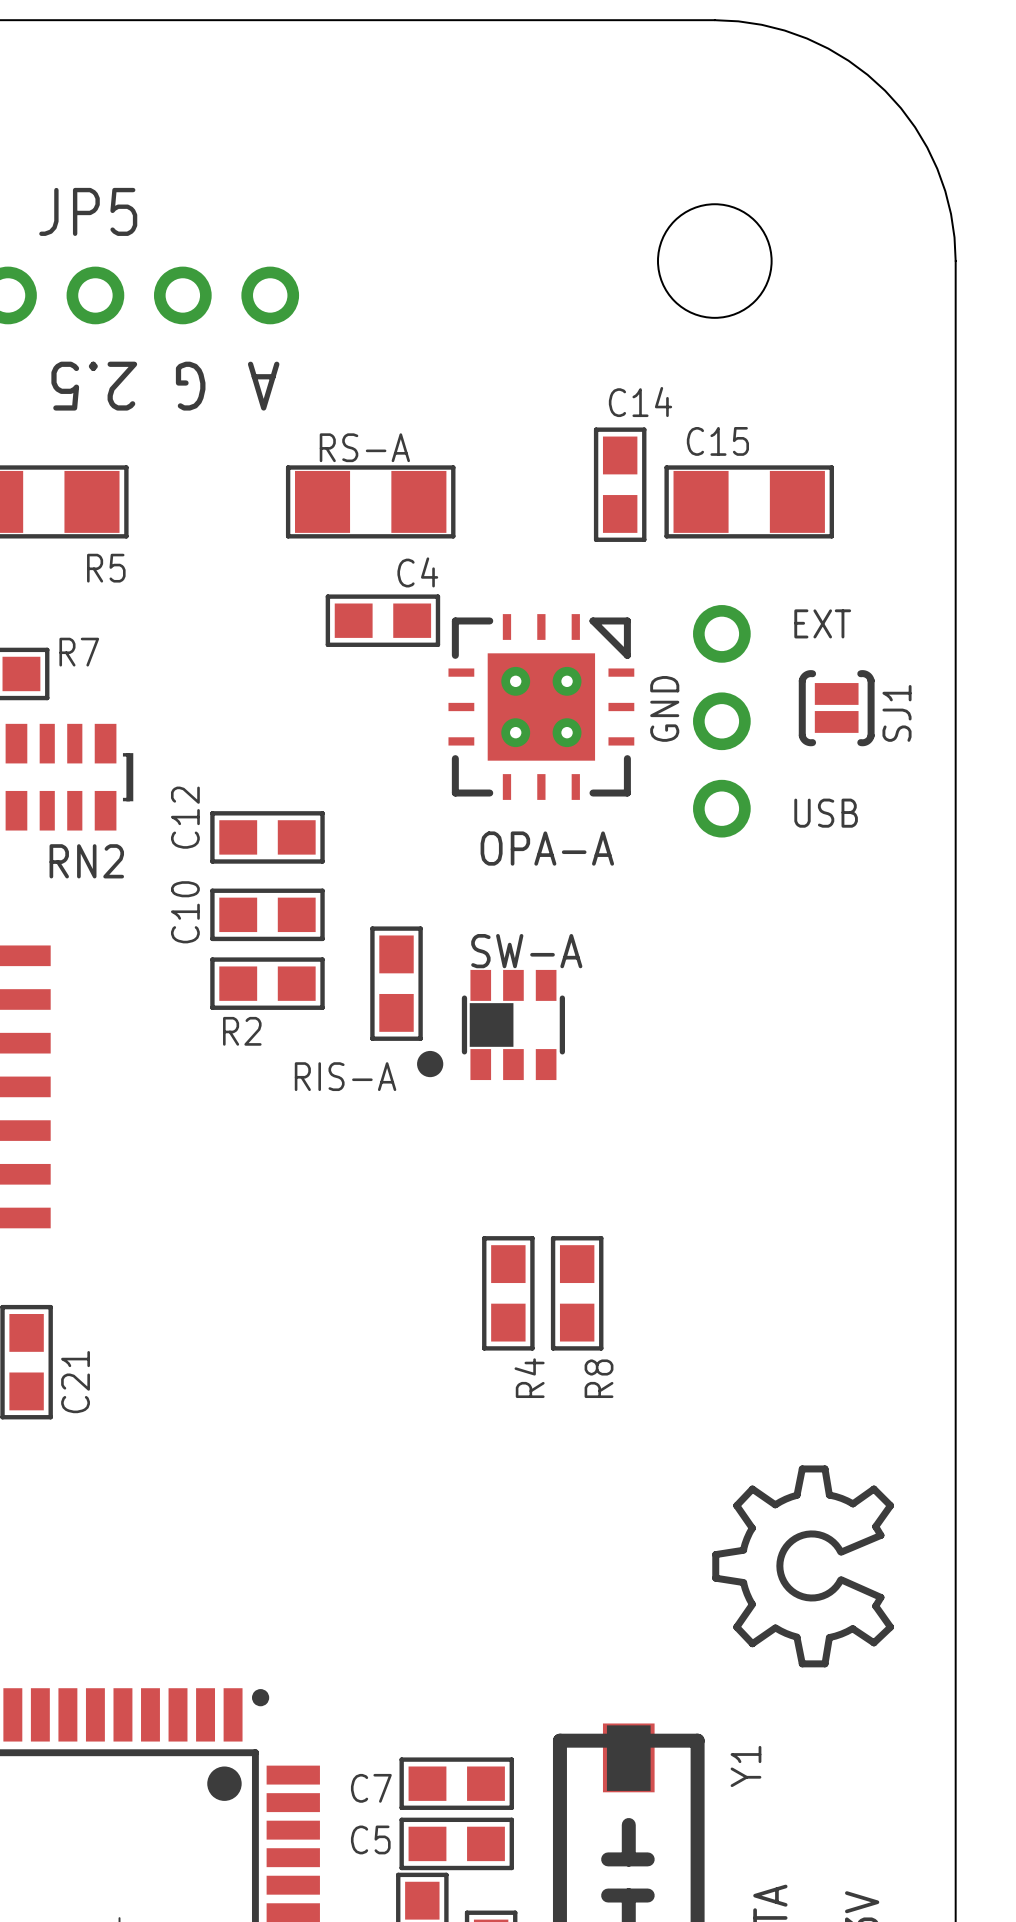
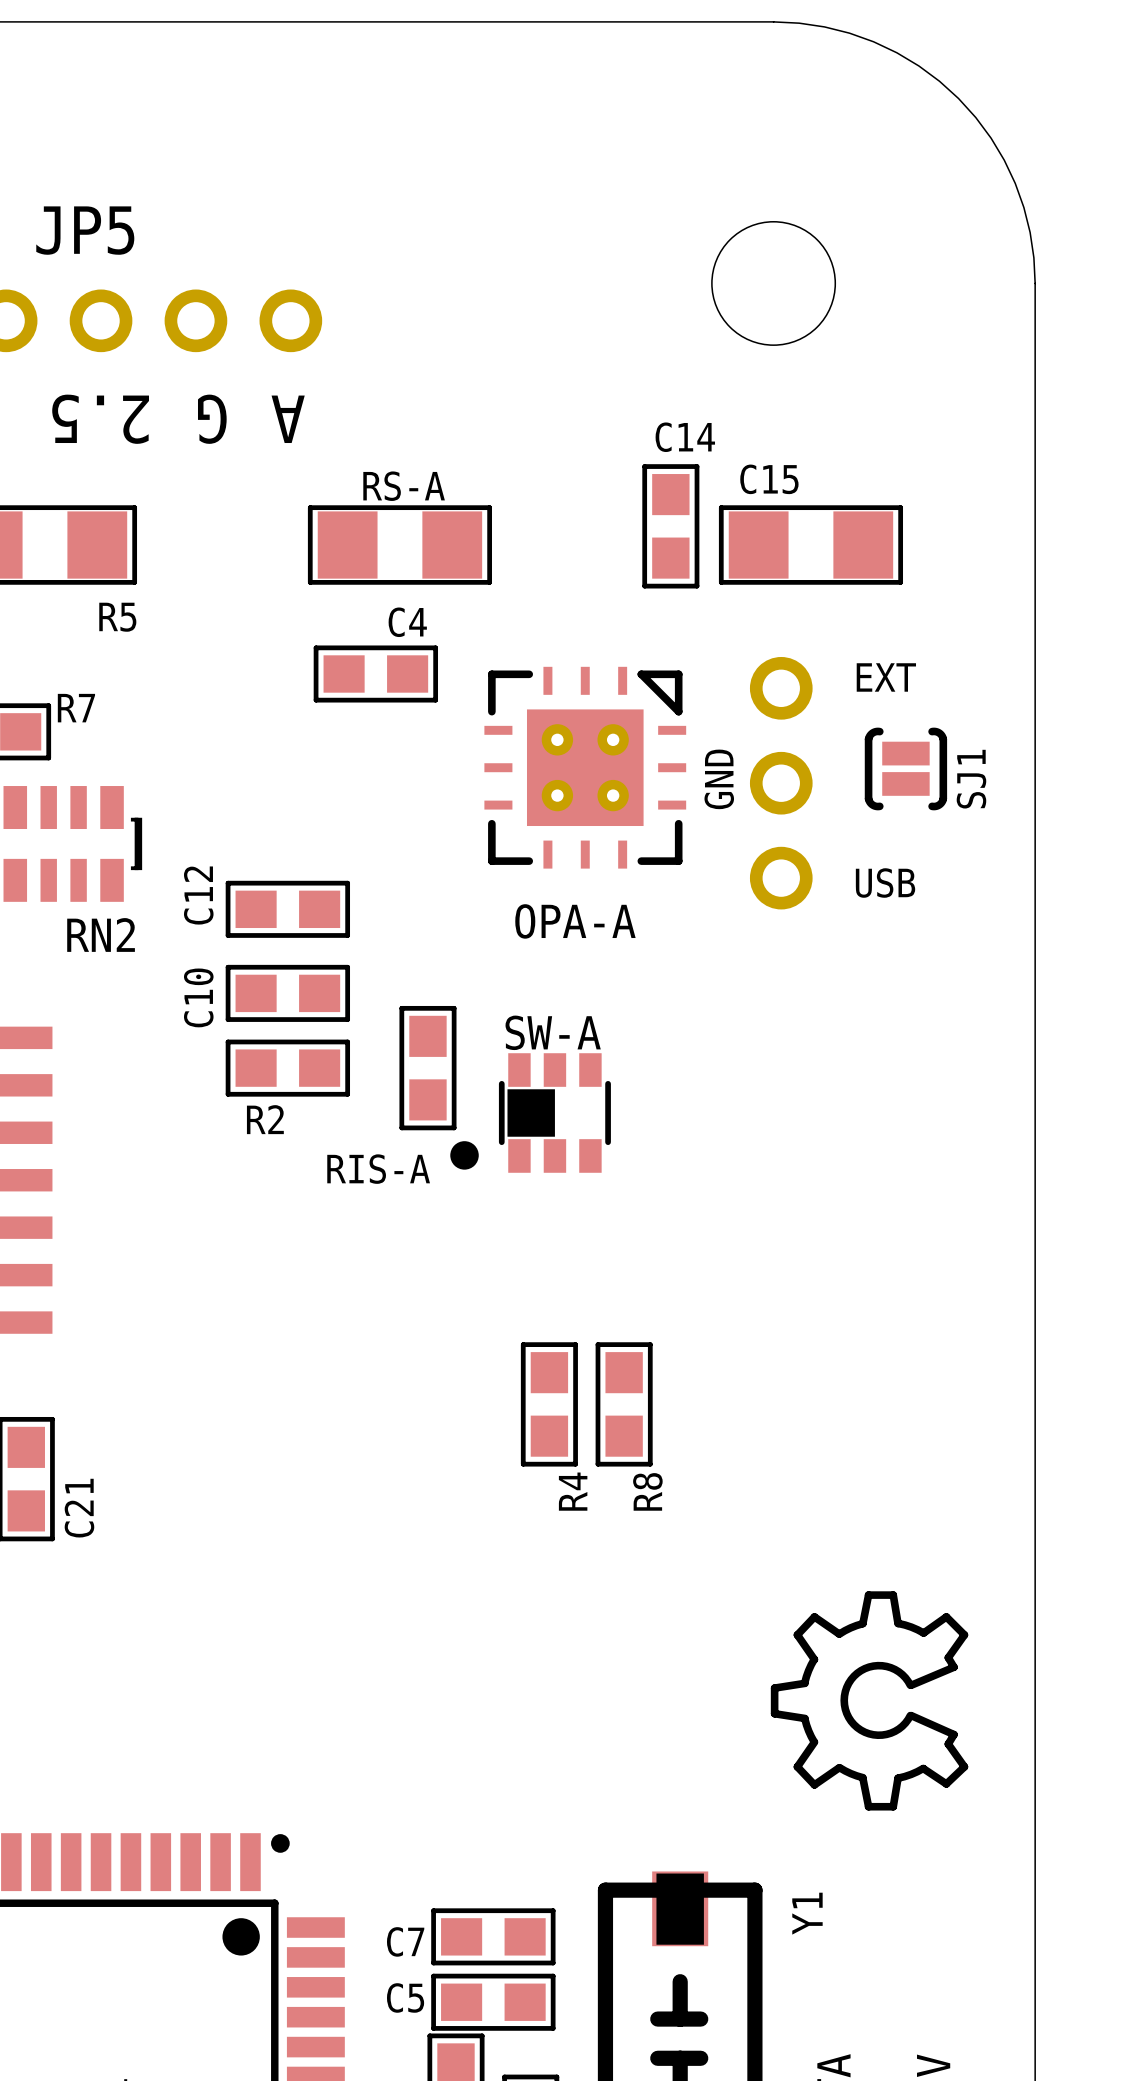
C4 position: (382, 620) -> (375, 674)

